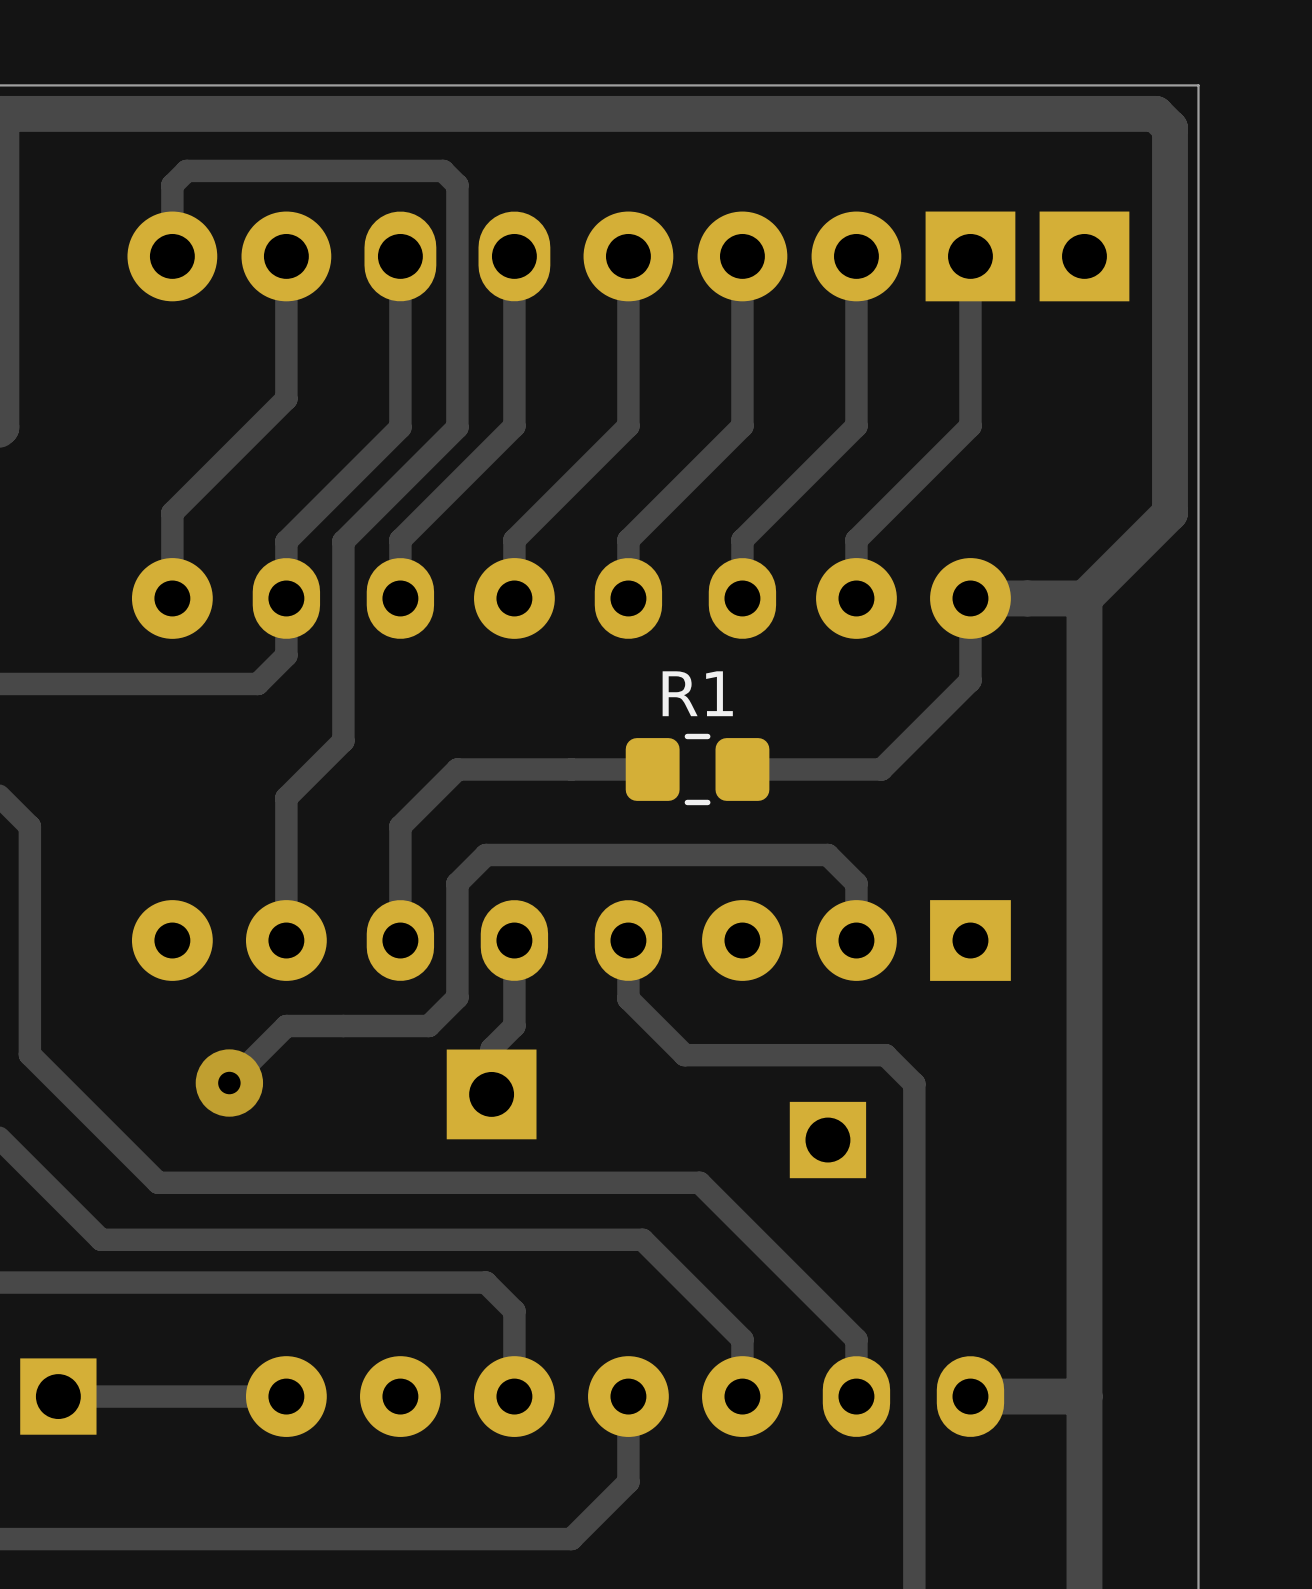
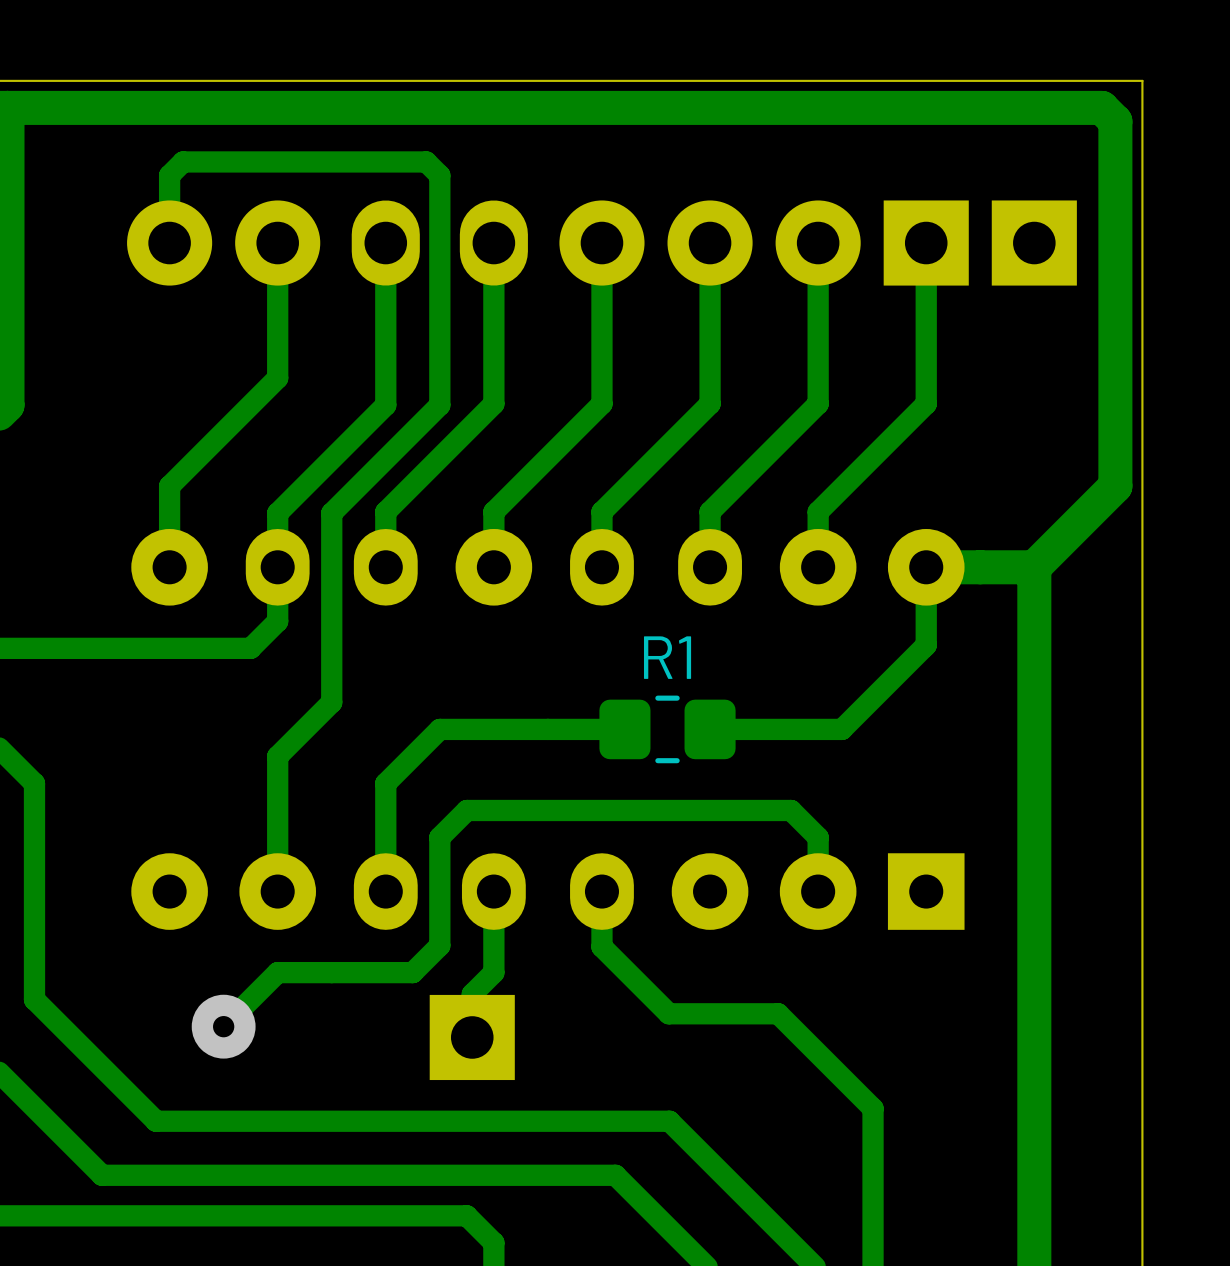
track: (684, 1055) (885, 1055) (914, 1083) (914, 1169) -> (655, 1000) (668, 1013) (778, 1013) (873, 1108)
part: (827, 1140) -> none

